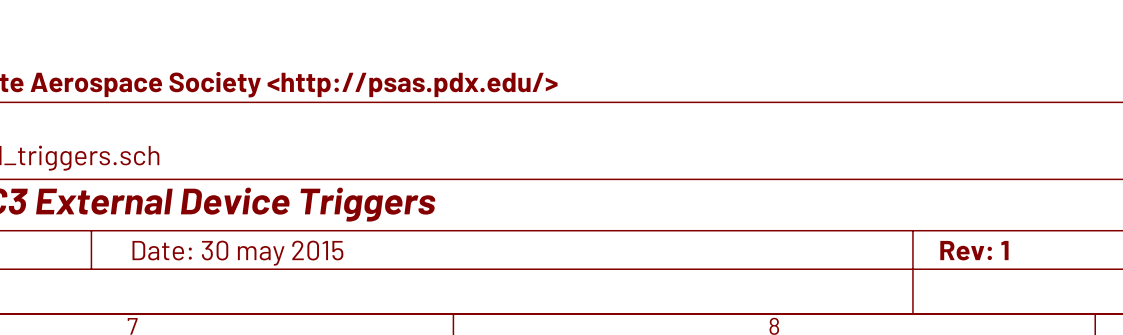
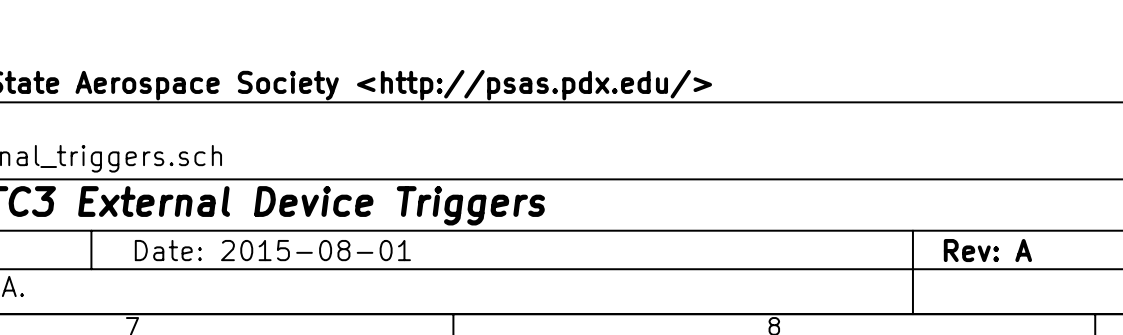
title block: Rev: 1 (974, 250) -> Rev: A (987, 250)
title block: Date: 30 may 2015 (237, 253) -> Date: 2015-08-01 (272, 250)

